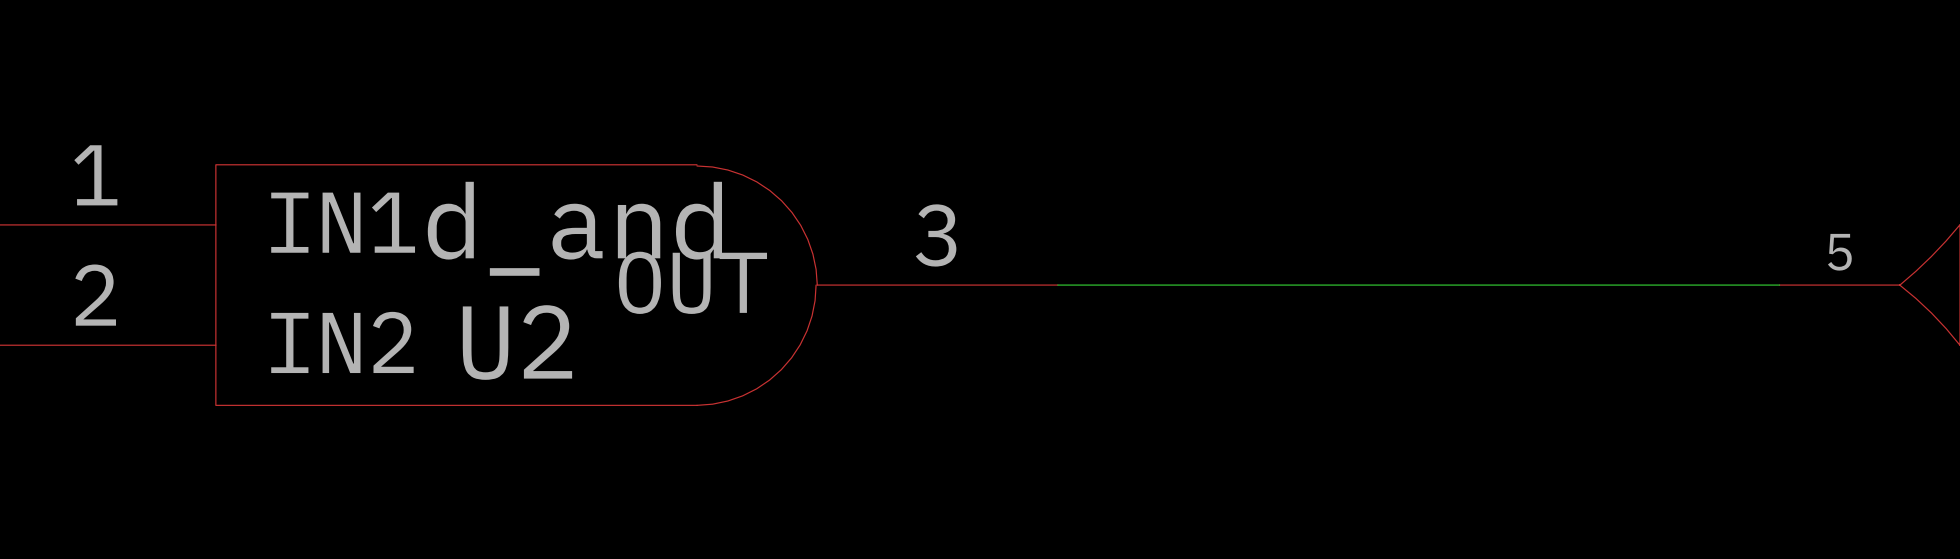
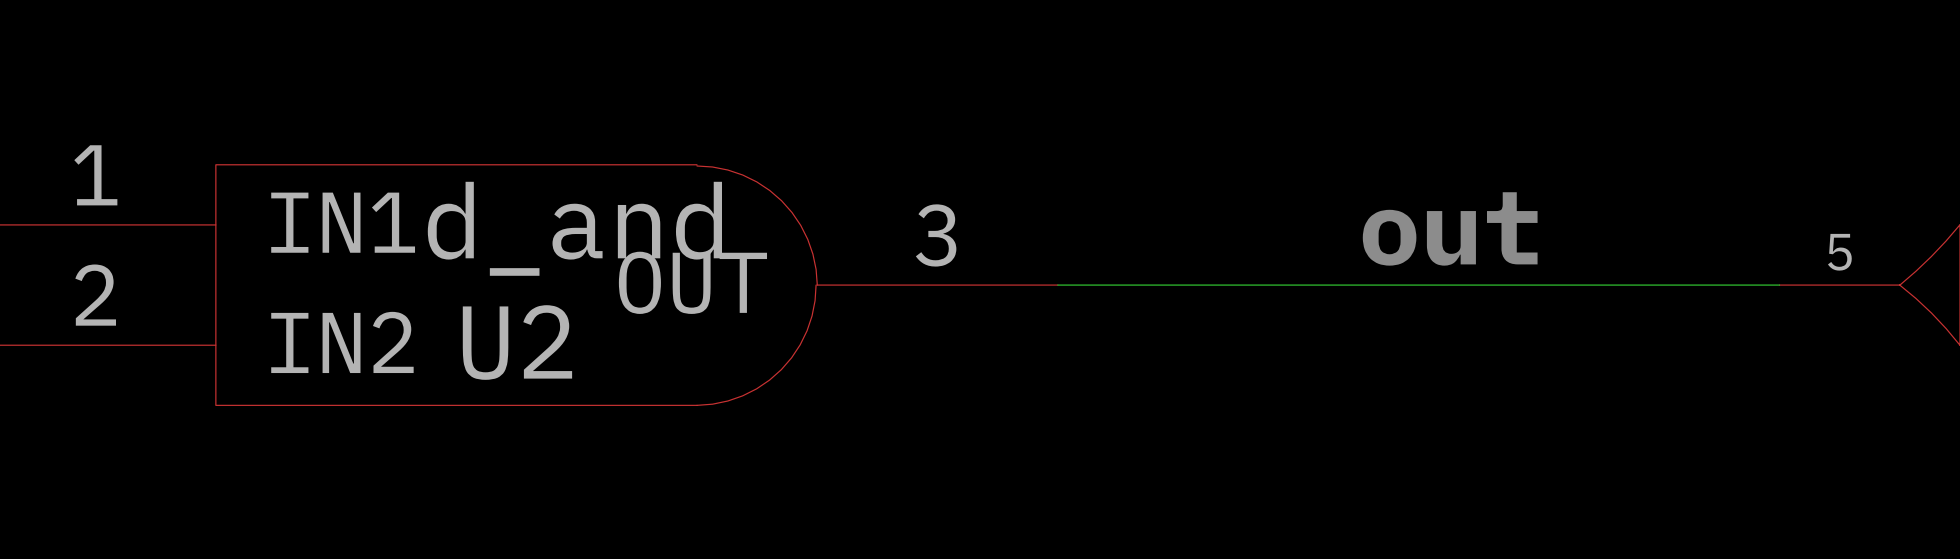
text: none -> out (1450, 228)

